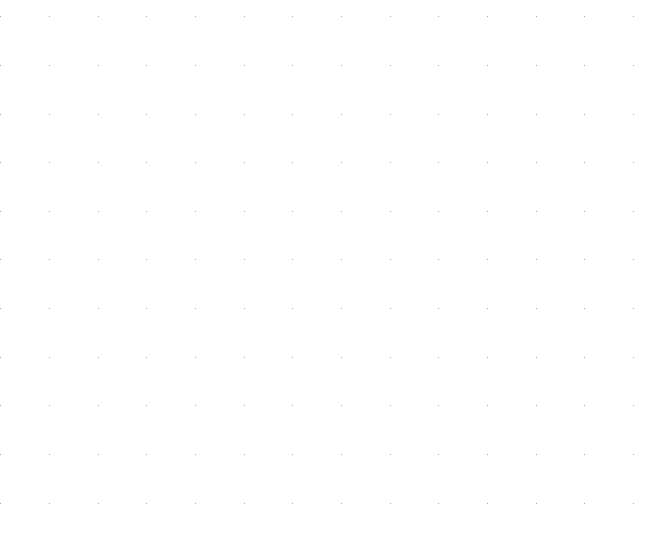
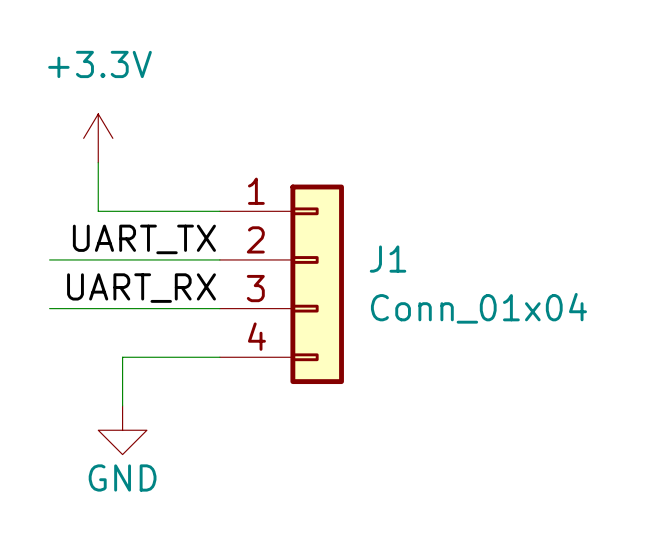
power symbol: none -> +3.3V (98, 138)
wire: none -> (98, 162) (98, 211) (219, 211)
label: none -> UART_TX (144, 239)
wire: none -> (49, 259) (219, 259)
J1: none -> Conn_01x04 (281, 284)
label: none -> UART_RX (141, 288)
wire: none -> (49, 308) (219, 308)
wire: none -> (219, 357) (122, 357) (122, 405)
power symbol: none -> GND (122, 430)

